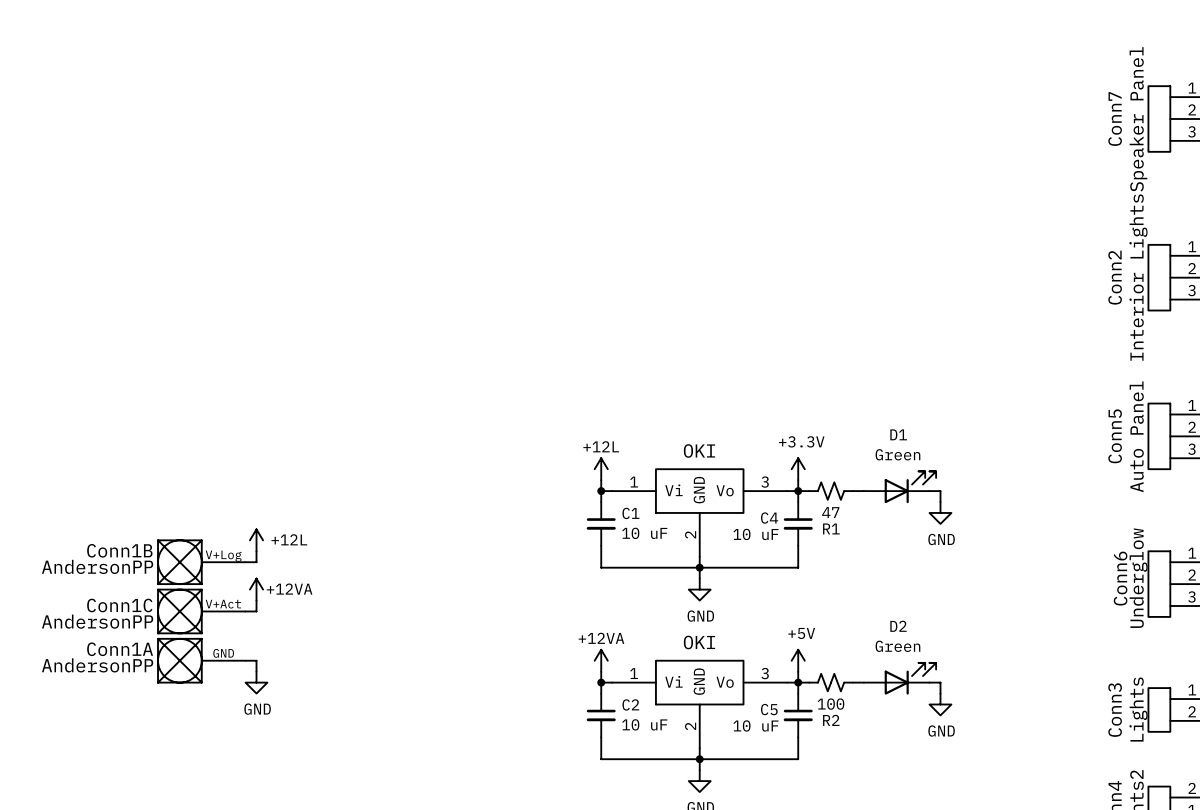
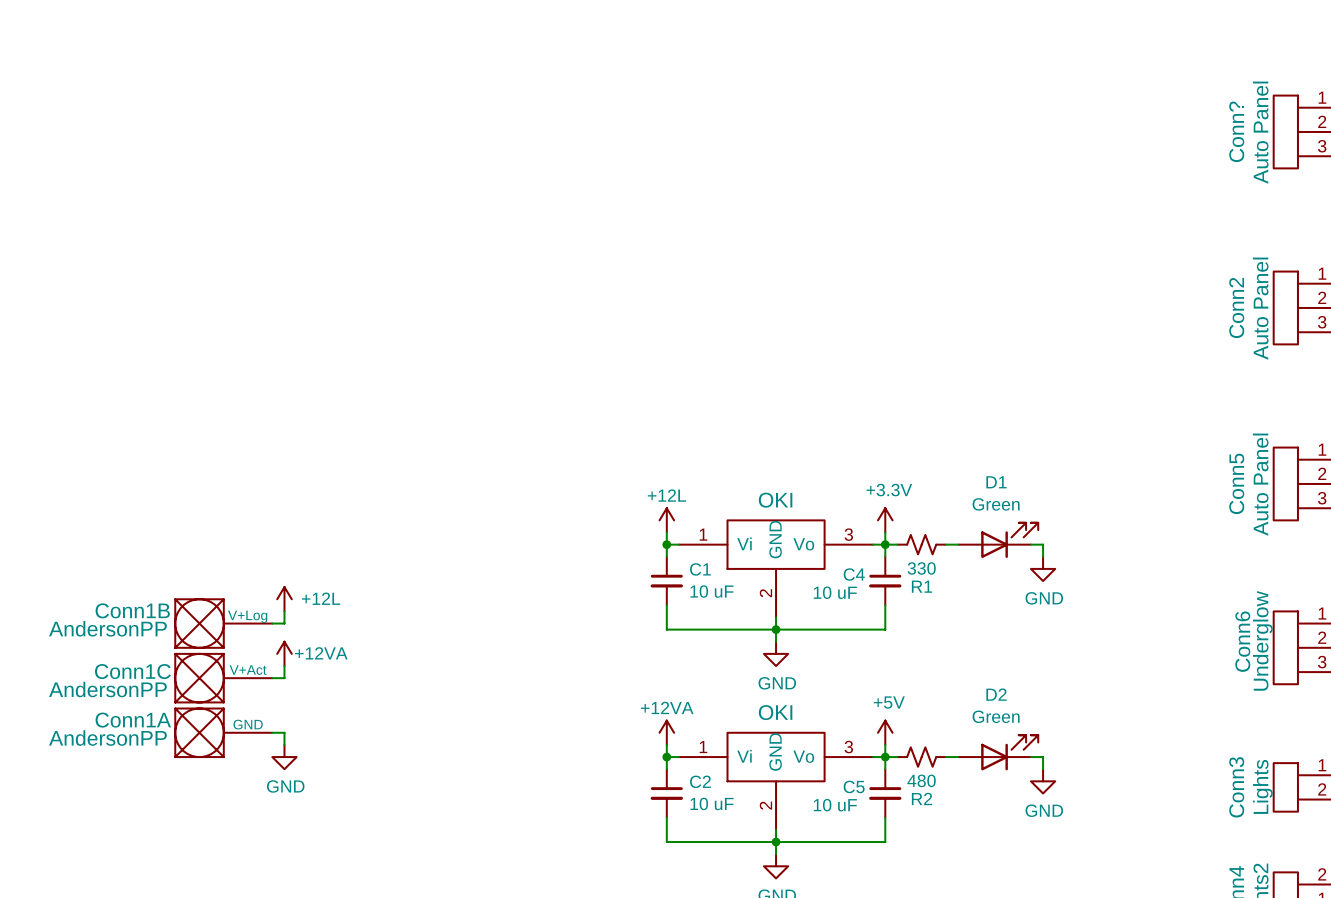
Conn7 name: Conn7 (1115, 118) -> Conn? (1236, 131)
Conn7 value: Speaker Panel (1138, 119) -> Auto Panel (1260, 132)
Conn2 value: Interior Lights (1138, 277) -> Auto Panel (1260, 308)
R1 value: 47 (830, 512) -> 330 (921, 568)
R2 value: 100 (831, 704) -> 480 (921, 780)

